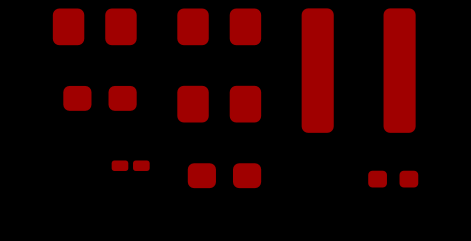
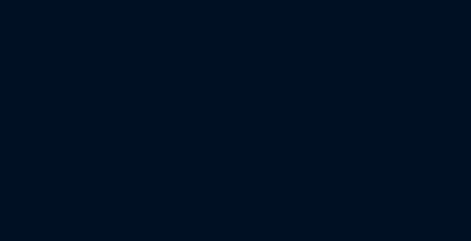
part: (94, 26) -> none
part: (219, 26) -> none
part: (358, 70) -> none
part: (100, 98) -> none
part: (219, 104) -> none
part: (130, 165) -> none
part: (224, 175) -> none
part: (393, 179) -> none

